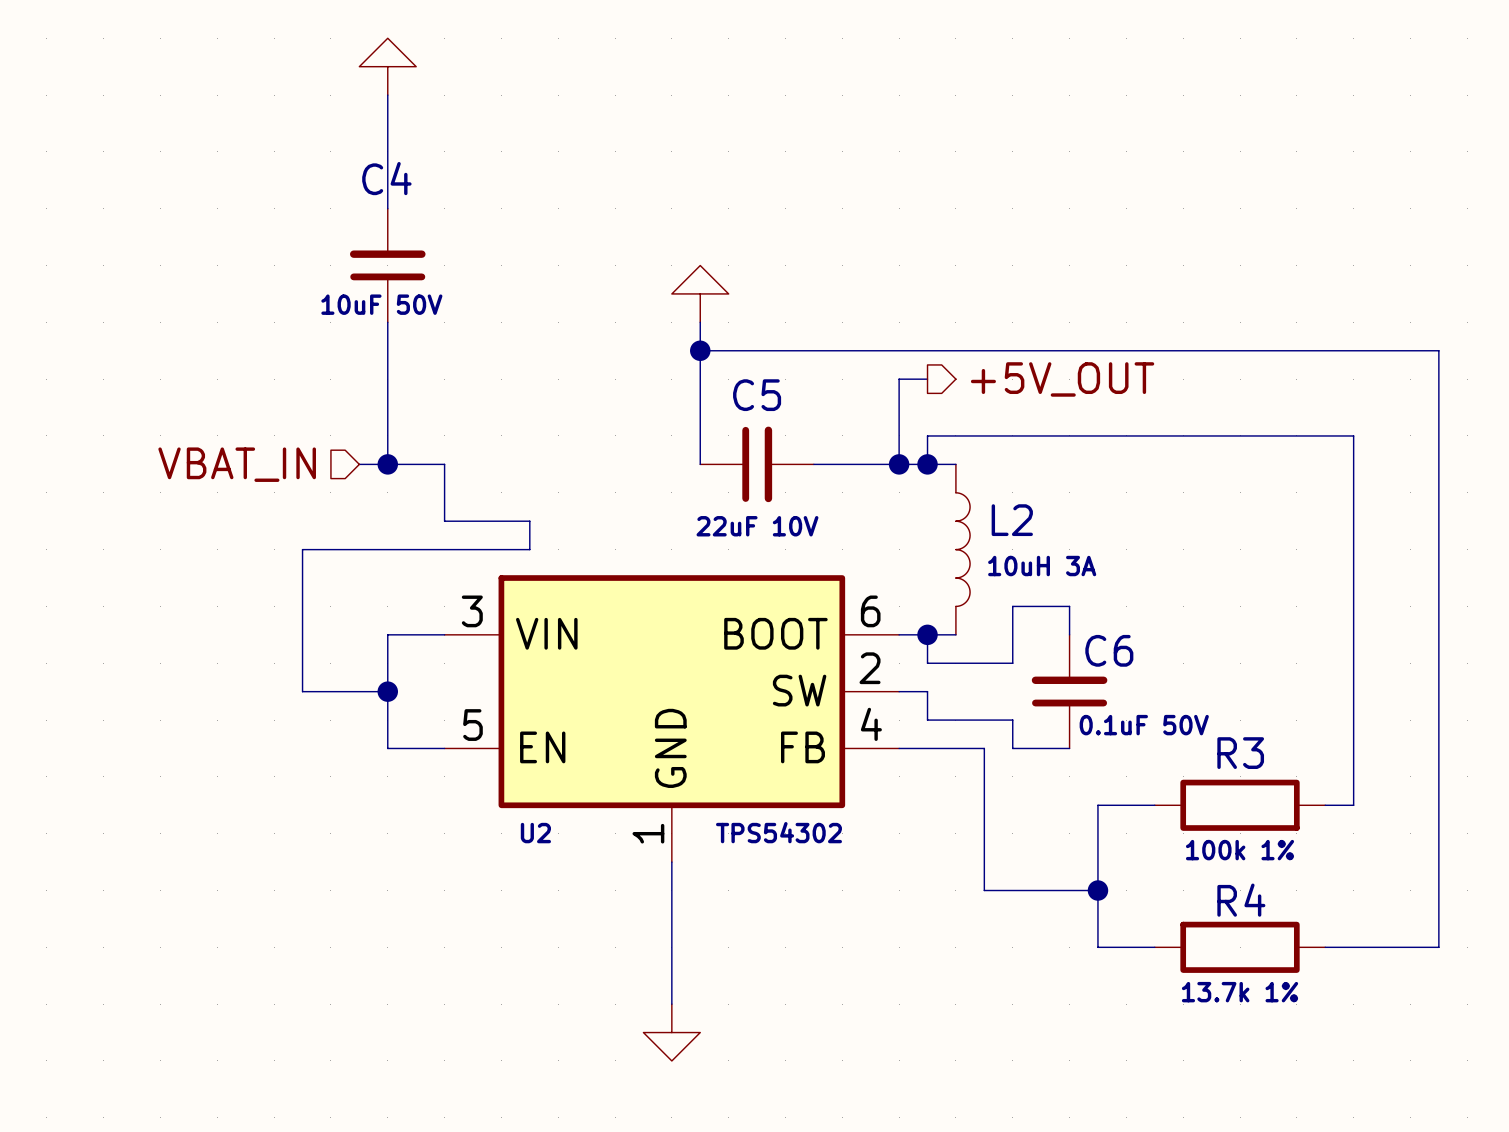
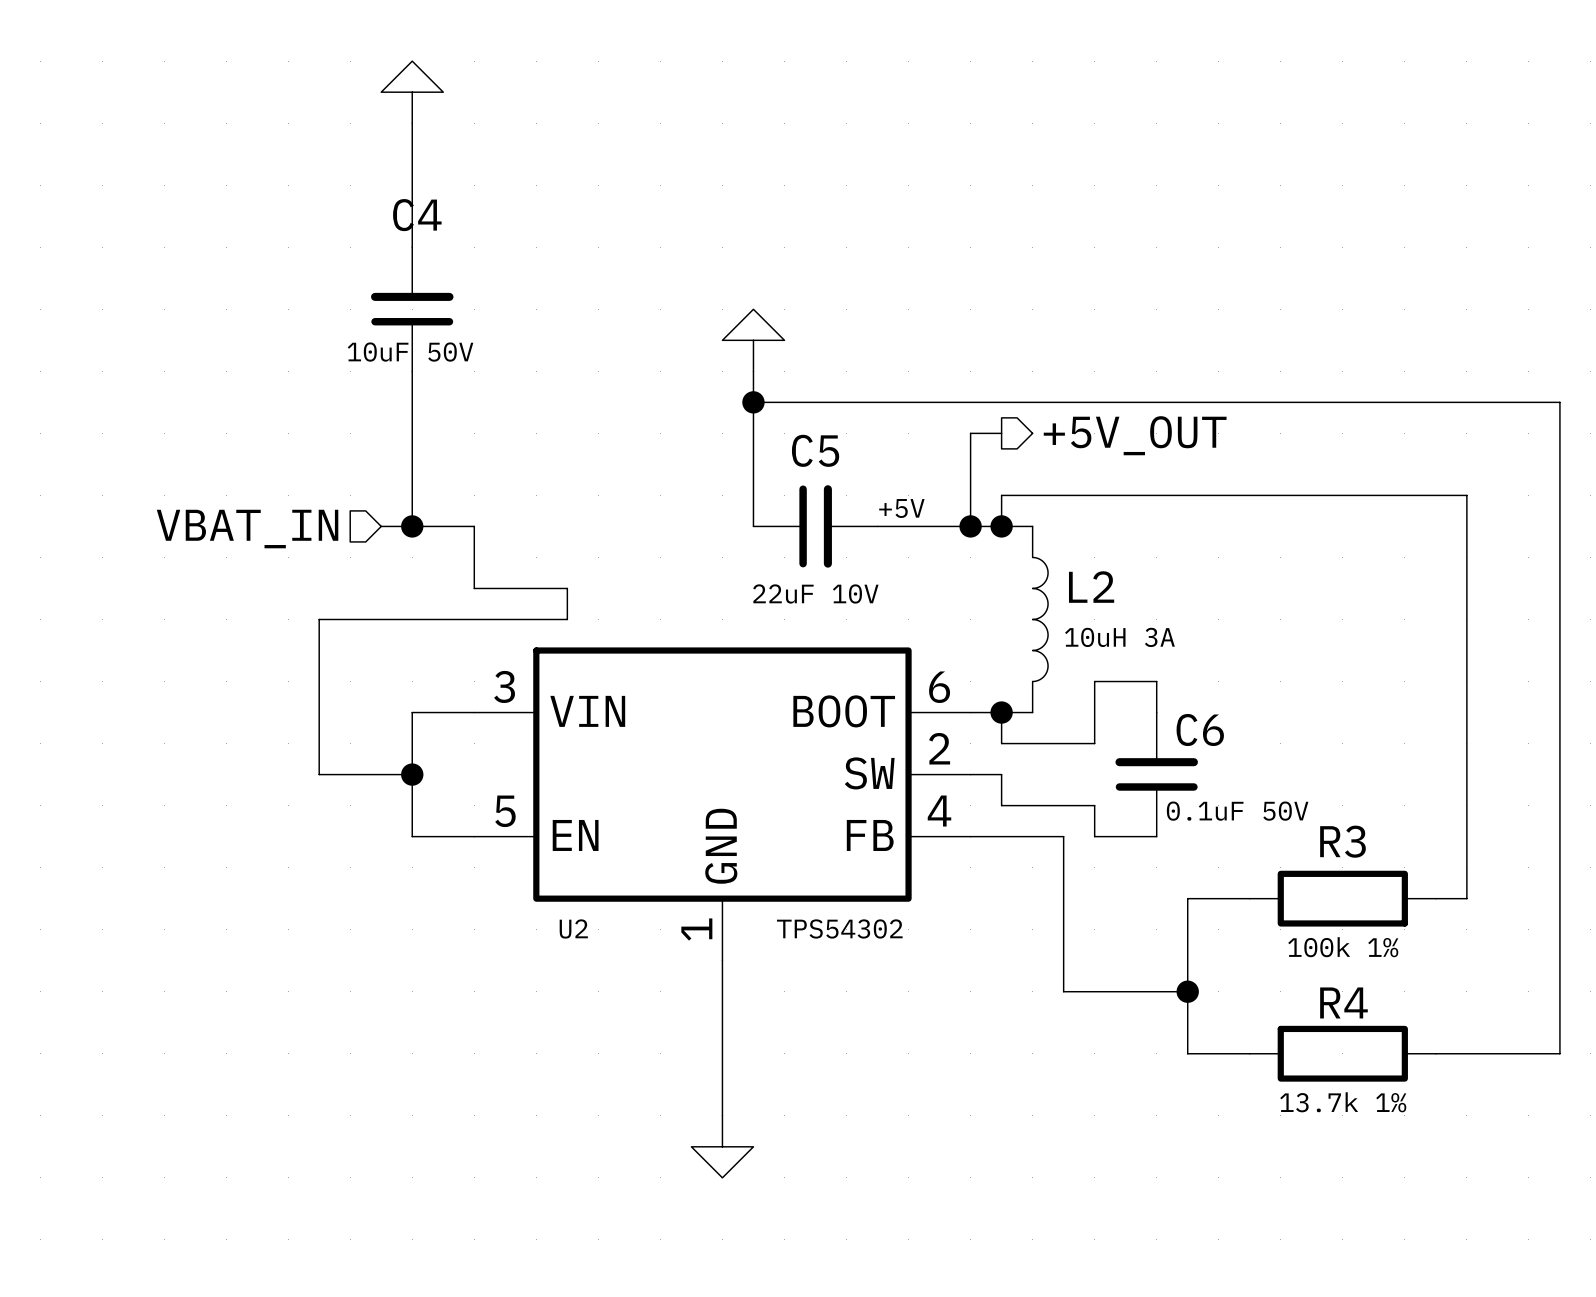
label: none -> +5V (901, 508)

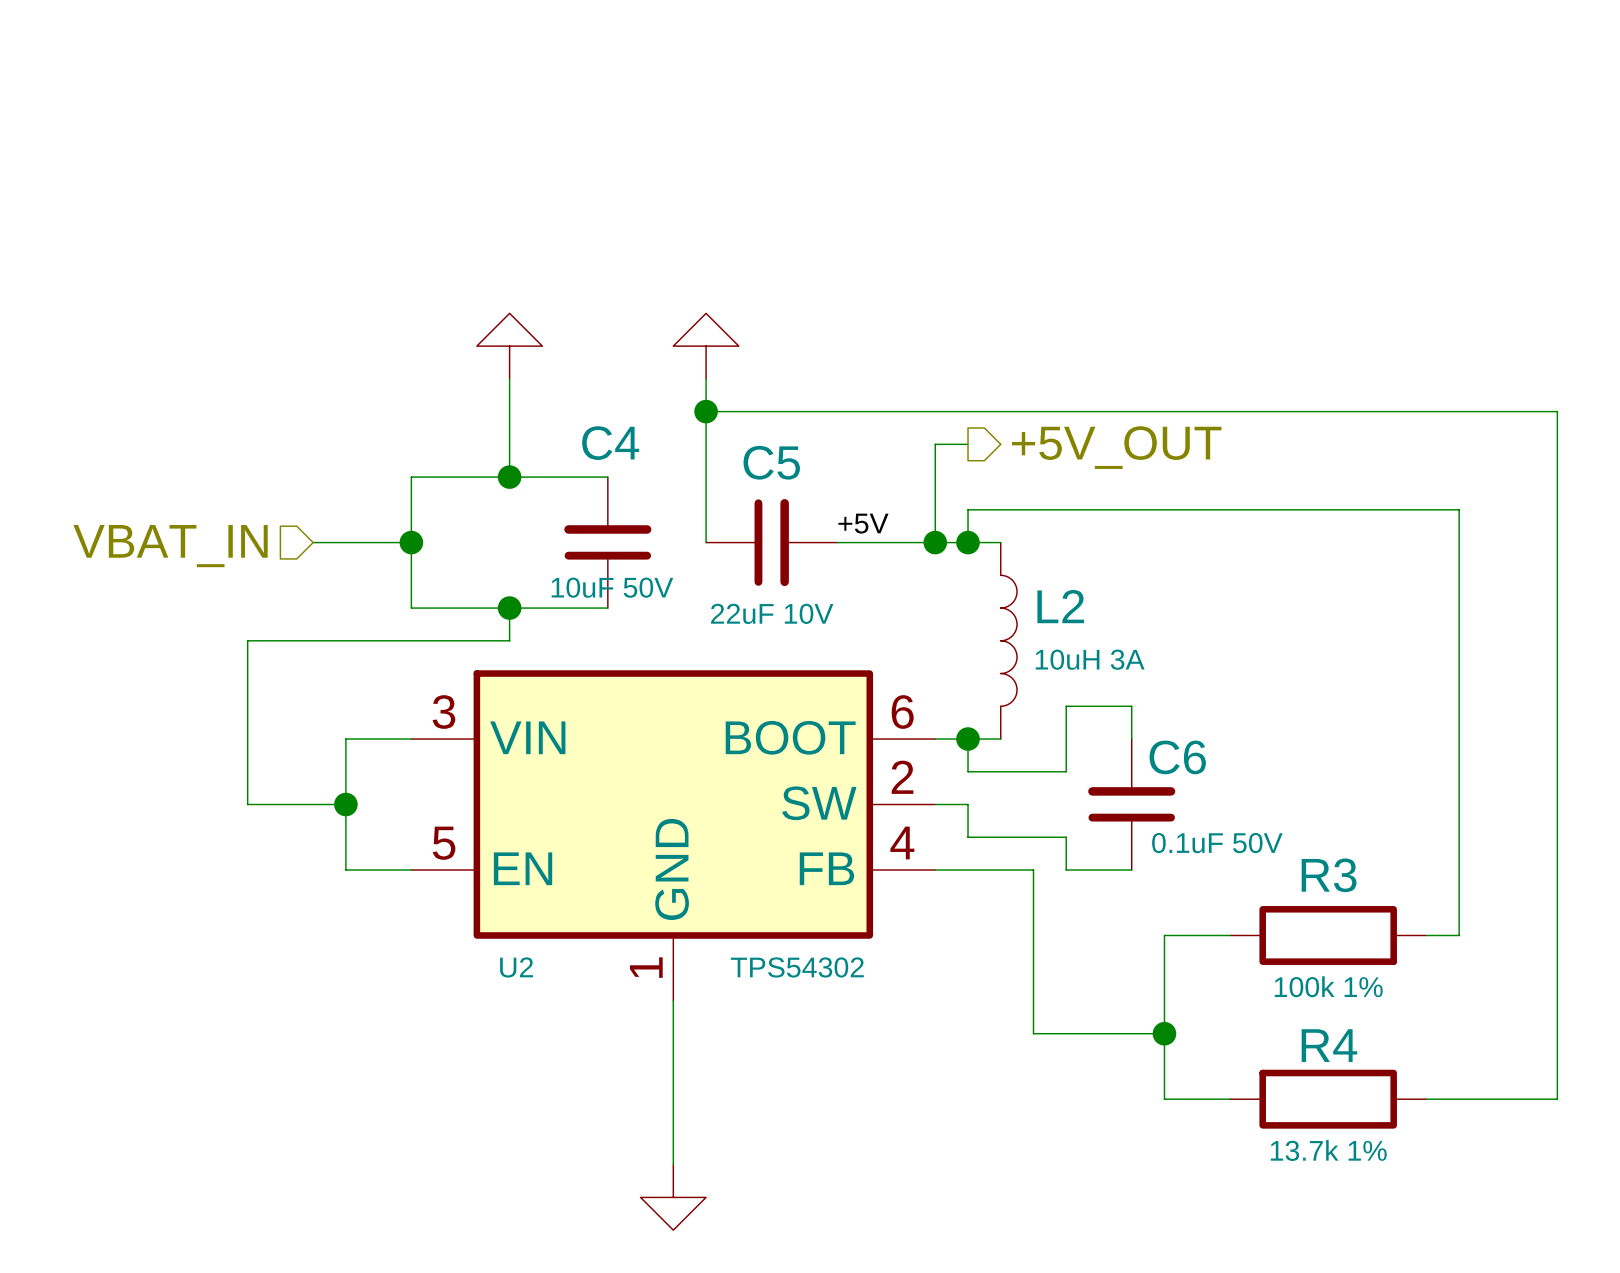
power symbol position: (412, 92) -> (509, 346)
wire: (412, 123) (412, 247) -> none
C4 position: (412, 309) -> (607, 542)
wire: (412, 371) (412, 526) -> none
wire: none -> (509, 378) (509, 477)
junction: none -> (509, 477)
wire: none -> (607, 477) (411, 477) (411, 542)
junction position: (412, 526) -> (411, 542)
wire: none -> (509, 608) (607, 608)
junction: none -> (509, 608)

